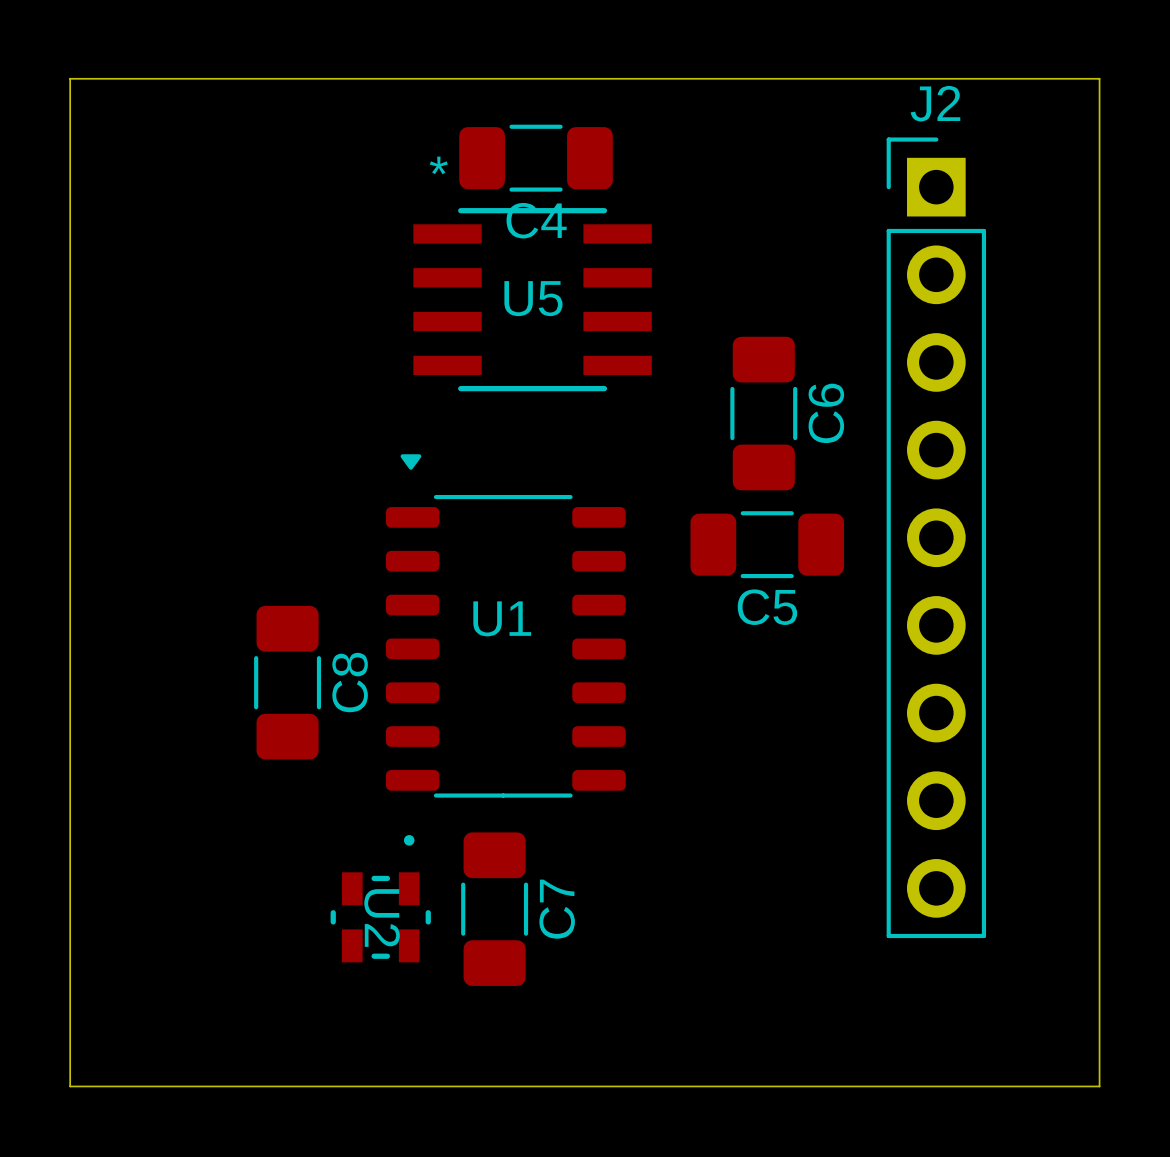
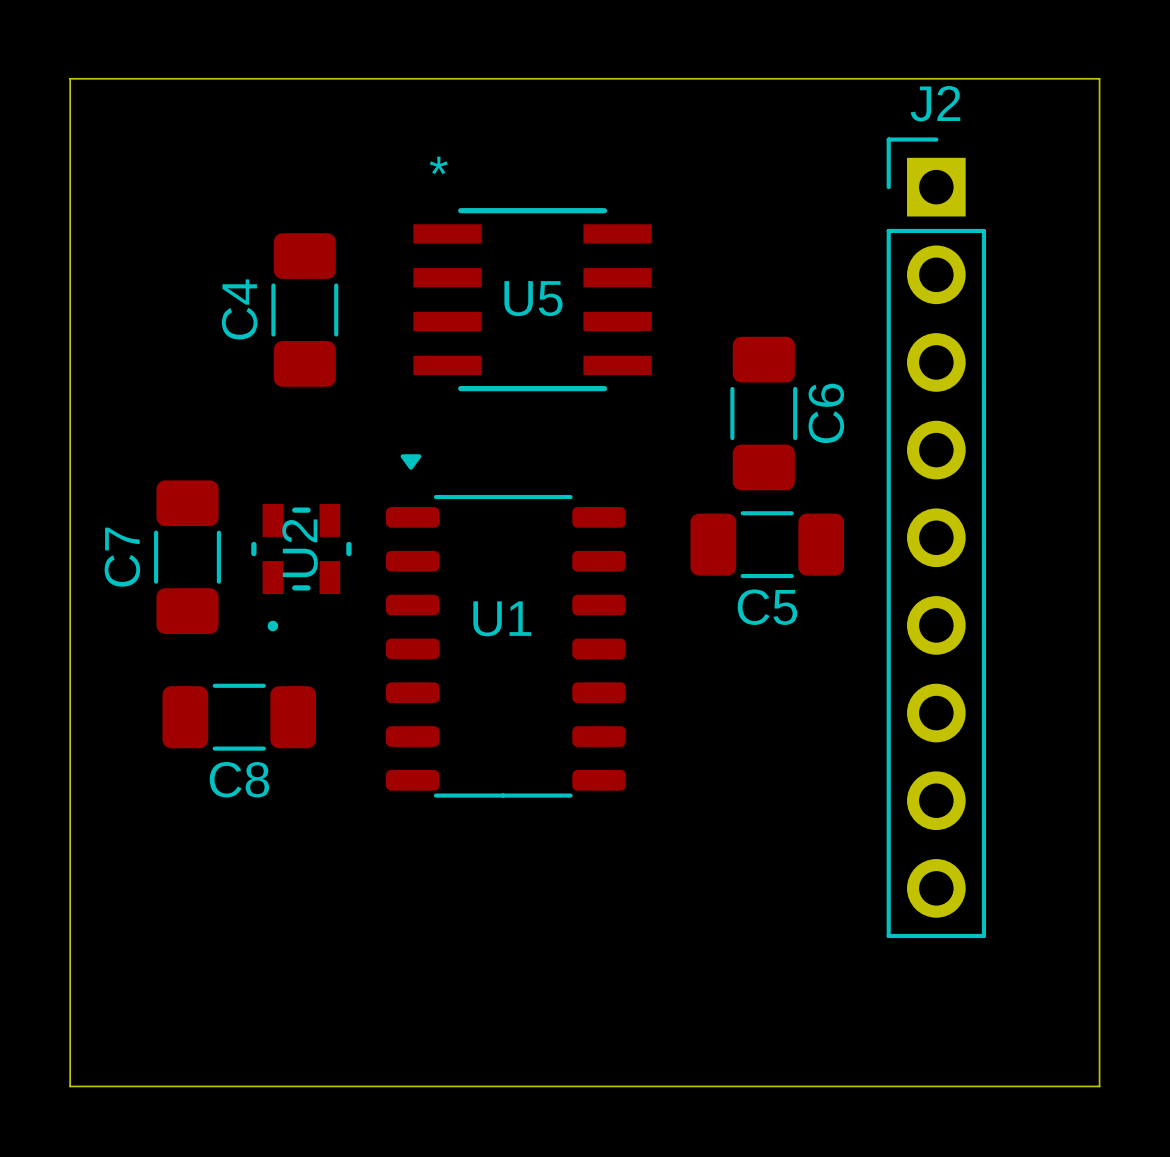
C4 rotation: 0° (536, 158) -> 90° clockwise (304, 310)
C4 position: (536, 158) -> (304, 310)
C8 rotation: 0° (287, 682) -> 90° clockwise (239, 717)
U2 rotation: 0° (380, 898) -> 180° (301, 567)
U2 position: (380, 898) -> (301, 567)
C7 position: (494, 909) -> (187, 557)
C7 name position: C7 (557, 909) -> C7 (122, 557)

